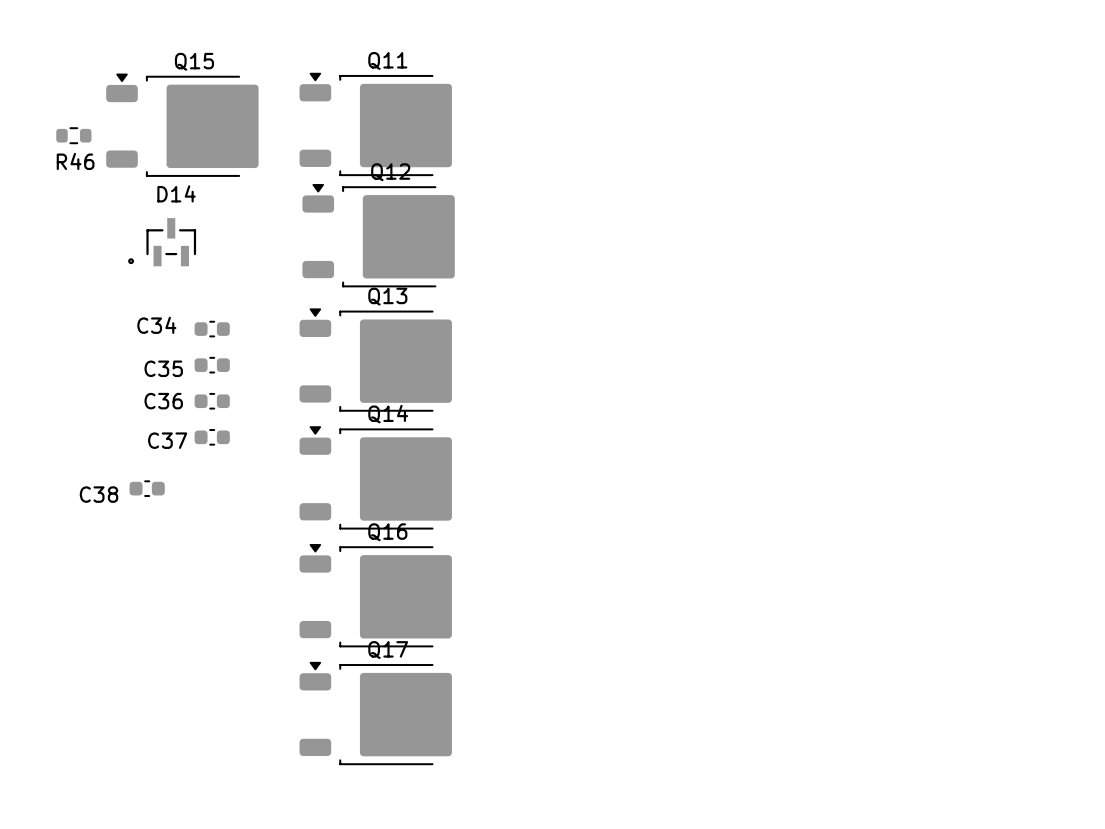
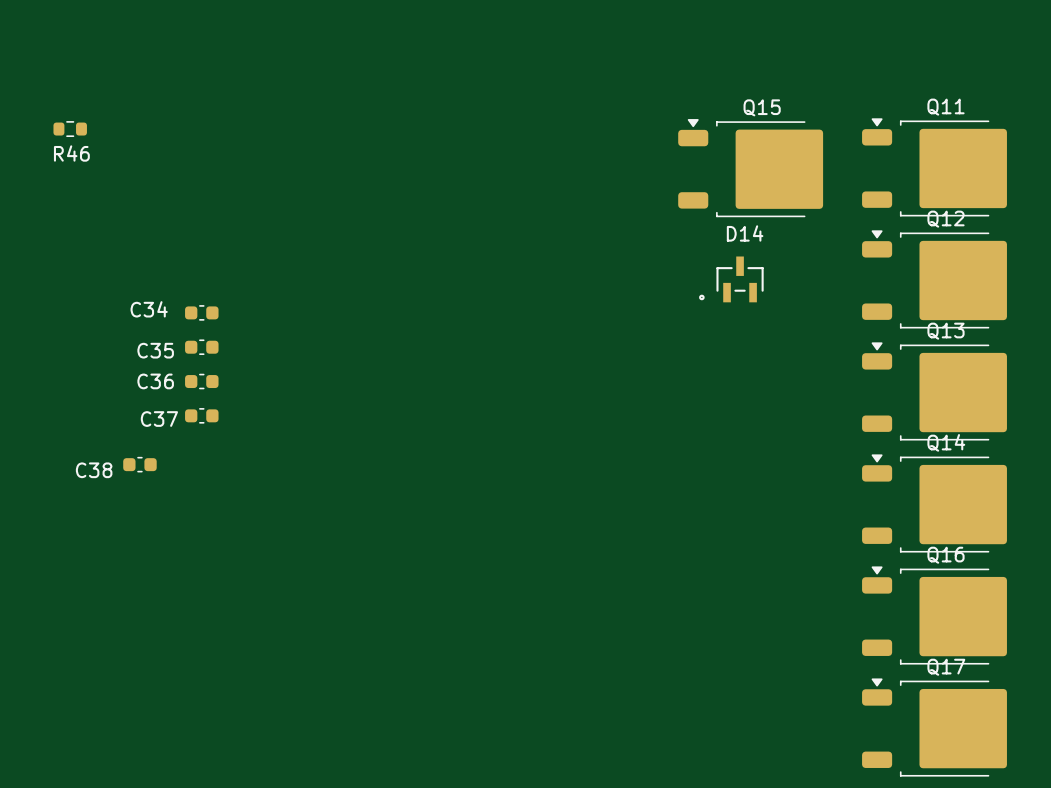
Q11 position: (375, 124) -> (934, 167)
Q15 position: (182, 125) -> (750, 168)
Q12 position: (378, 235) -> (934, 279)
D14 position: (162, 242) -> (731, 279)
Q13 position: (375, 360) -> (934, 391)
Q14 position: (375, 477) -> (934, 503)
Q16 position: (375, 595) -> (934, 615)
Q17 position: (375, 713) -> (934, 727)

